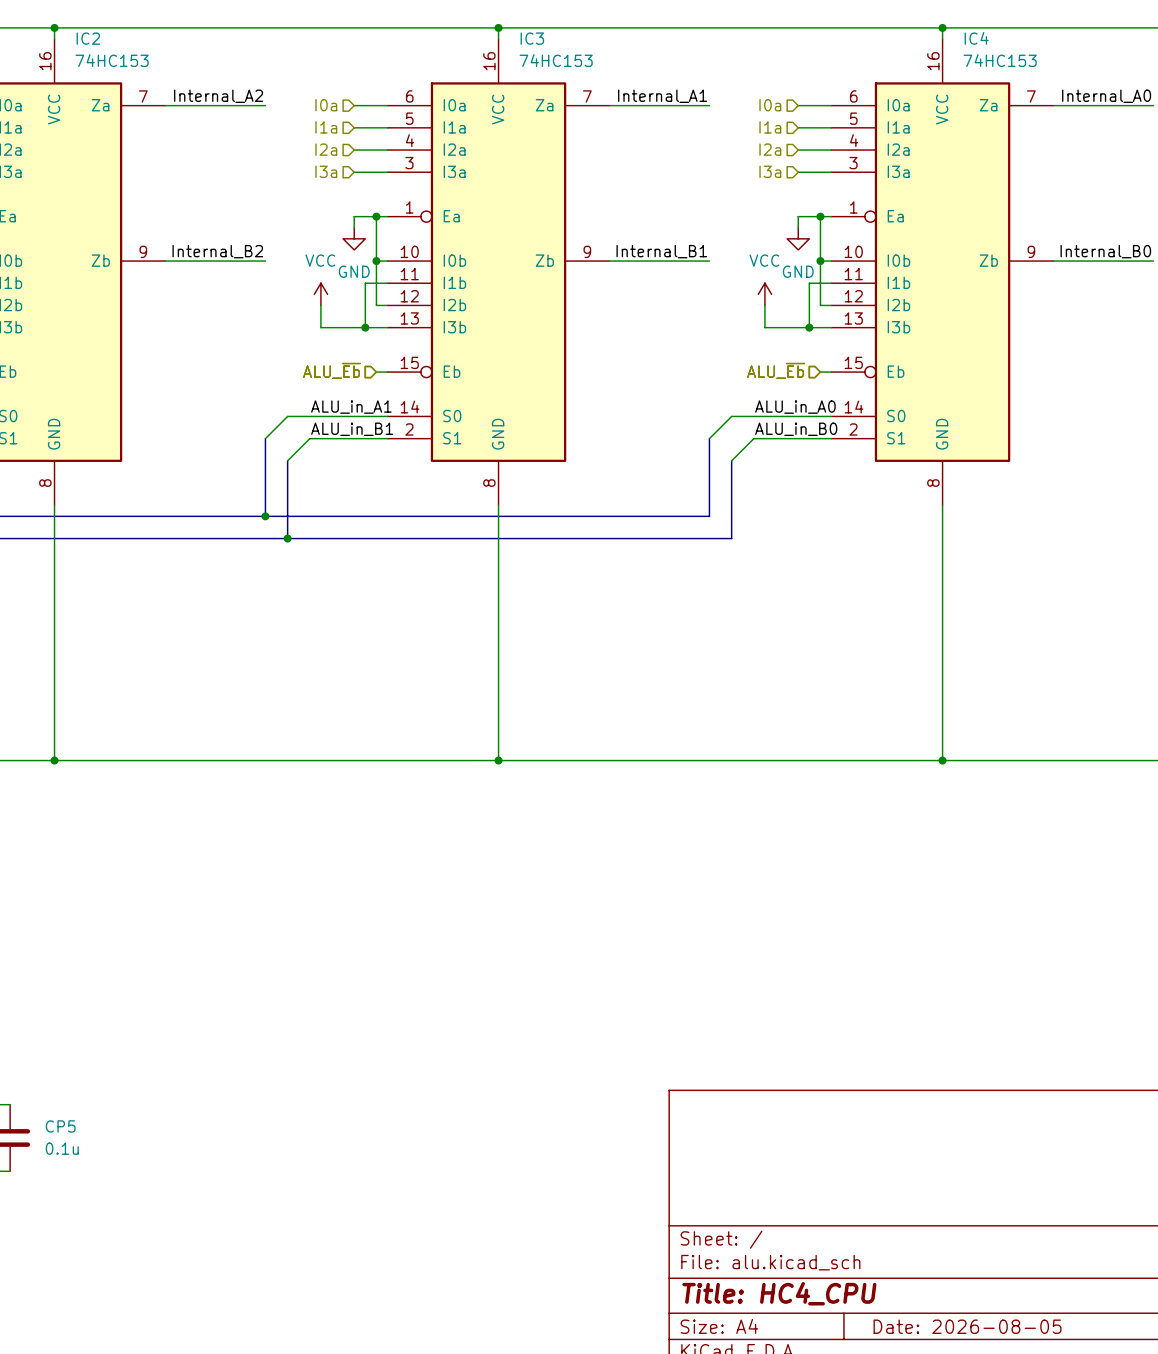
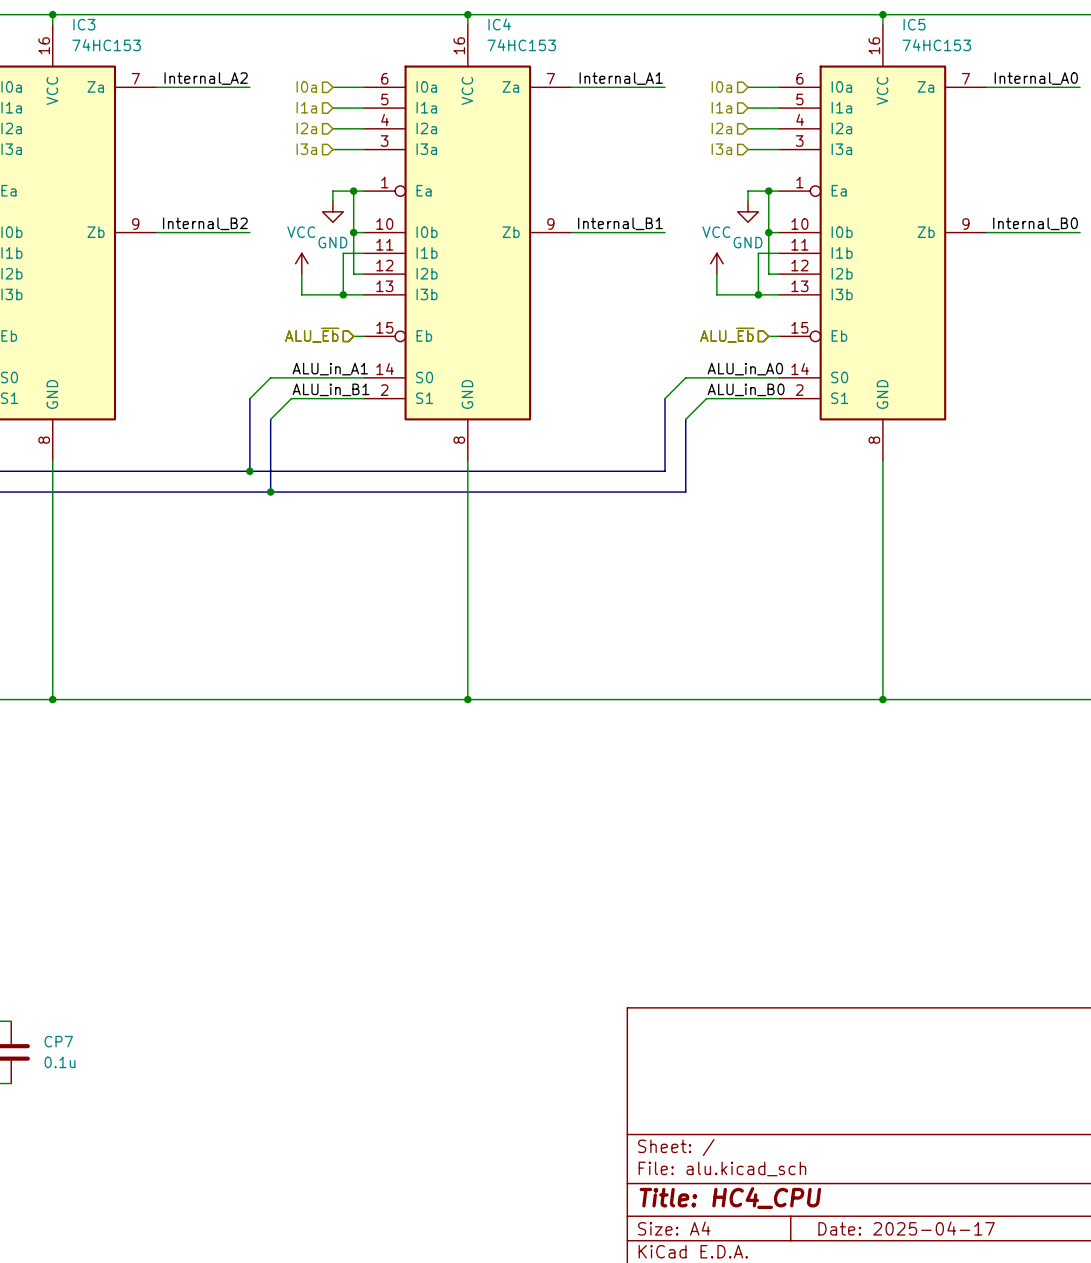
IC2 name: IC2 (88, 38) -> IC3 (84, 24)
IC3 name: IC3 (532, 38) -> IC4 (499, 24)
IC4 name: IC4 (976, 38) -> IC5 (914, 24)
CP5 name: CP5 (60, 1126) -> CP7 (58, 1041)
title block: Date: 2026-08-05 (967, 1326) -> Date: 2025-04-17 (906, 1228)

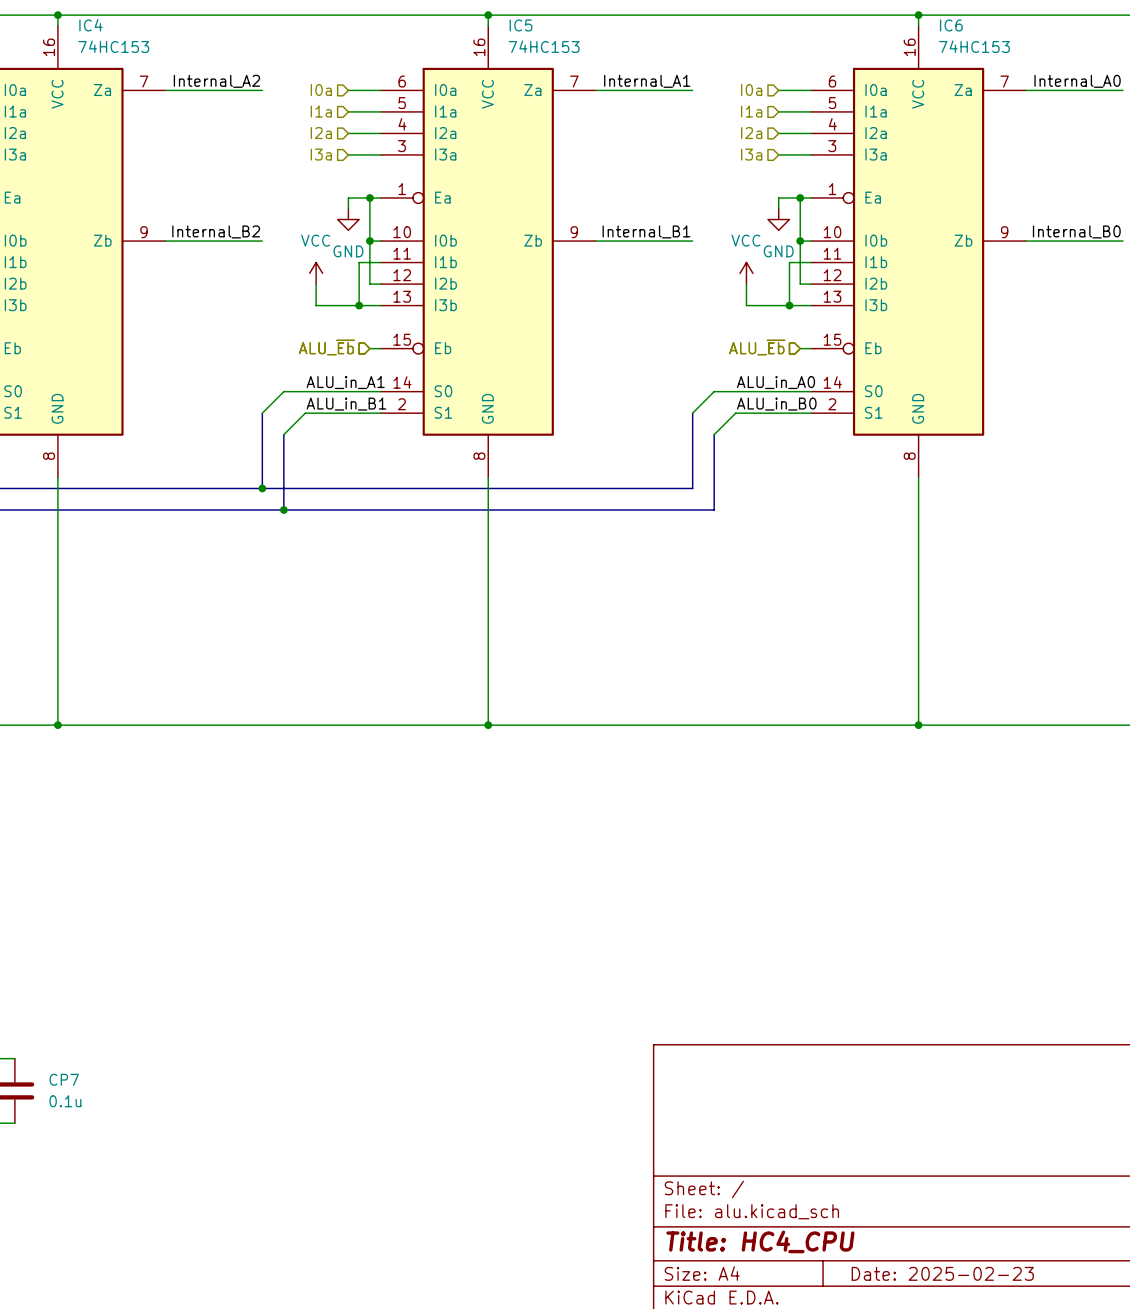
IC3 name: IC3 (84, 24) -> IC4 (90, 25)
IC4 name: IC4 (499, 24) -> IC5 (521, 25)
IC5 name: IC5 (914, 24) -> IC6 (951, 25)
title block: Date: 2025-04-17 (906, 1228) -> Date: 2025-02-23 (942, 1273)

